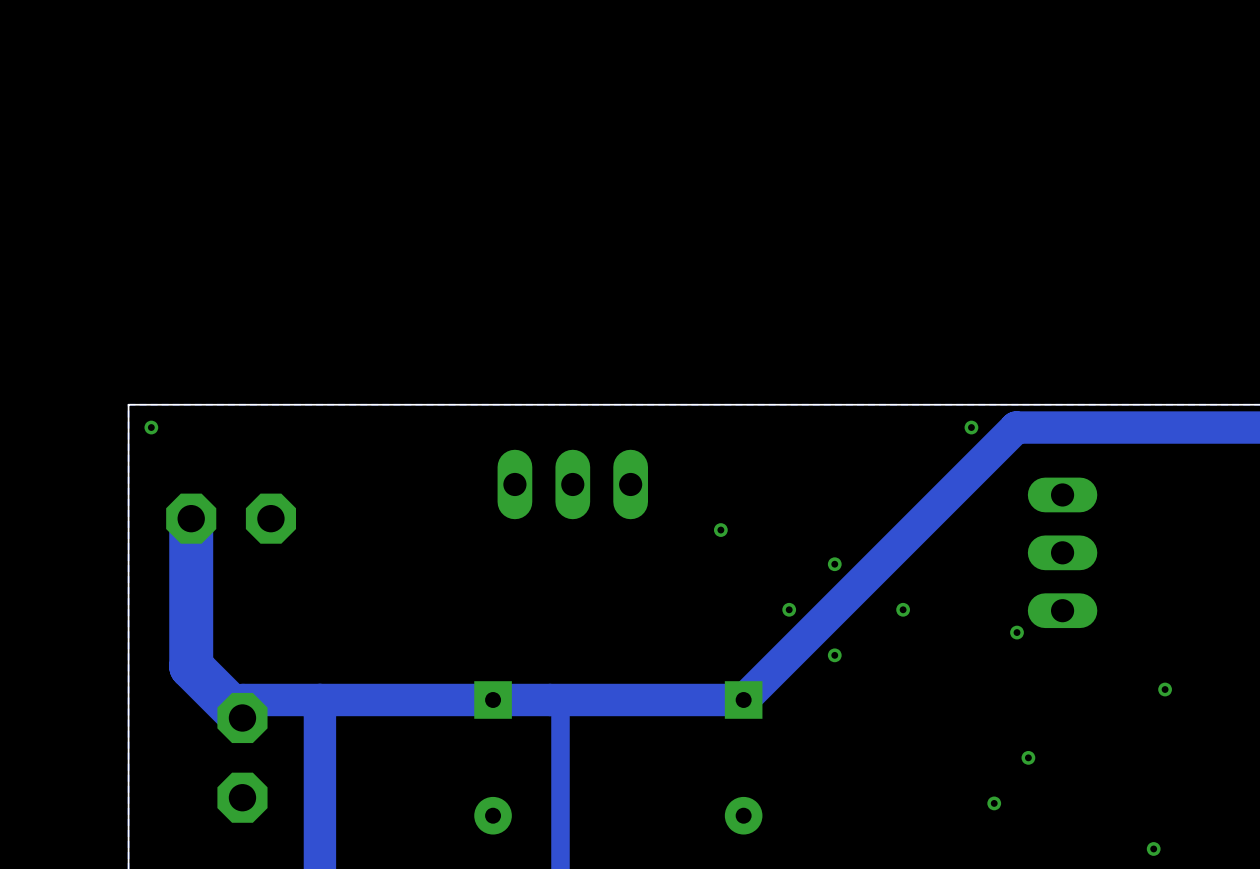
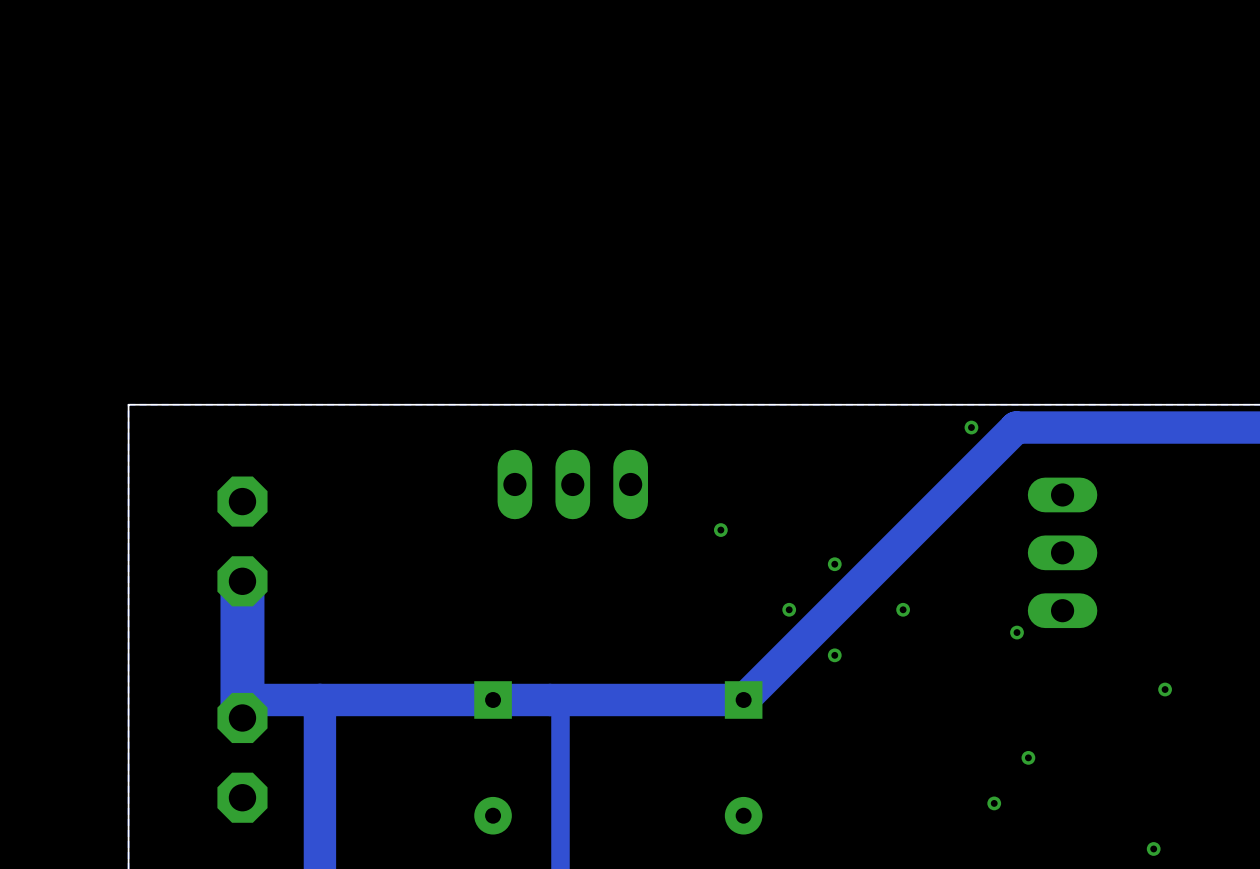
via: (151, 427) -> none
track: (191, 518) (191, 666) (242, 717) -> (242, 581) (242, 717)
part rotation: 0° (231, 518) -> 90° clockwise (242, 541)

